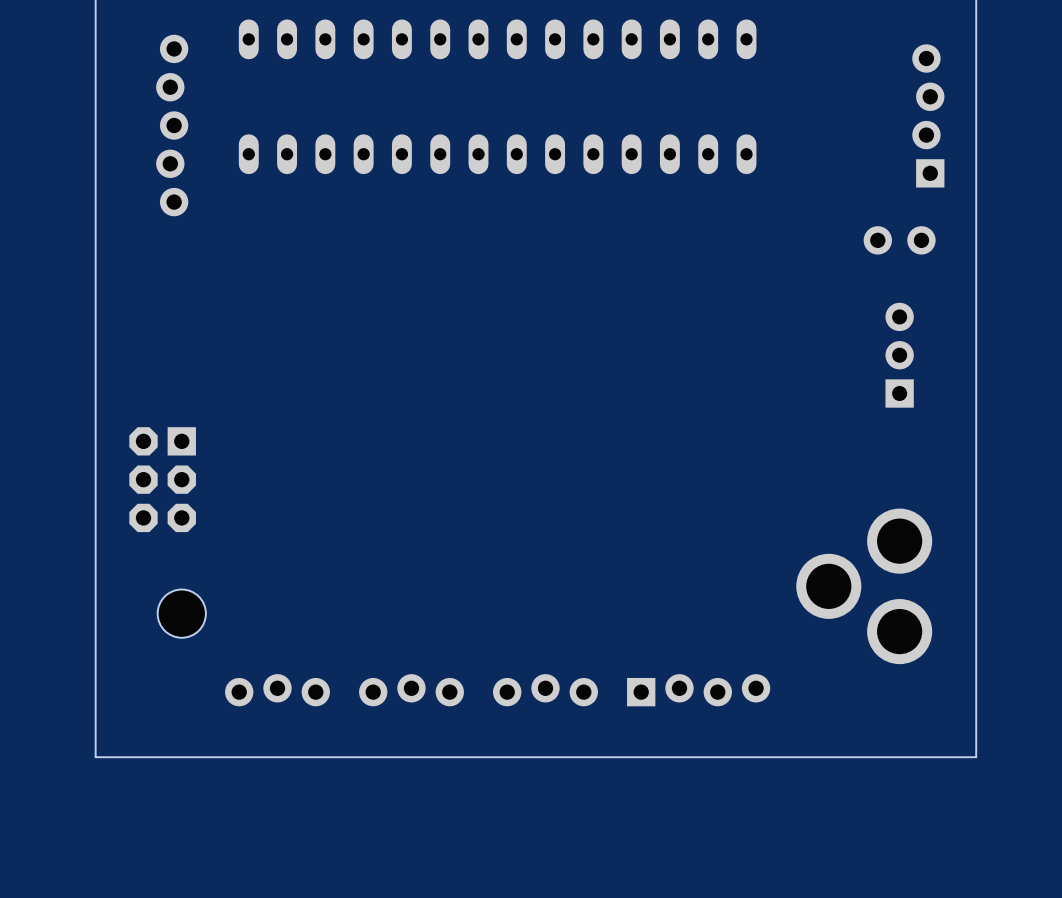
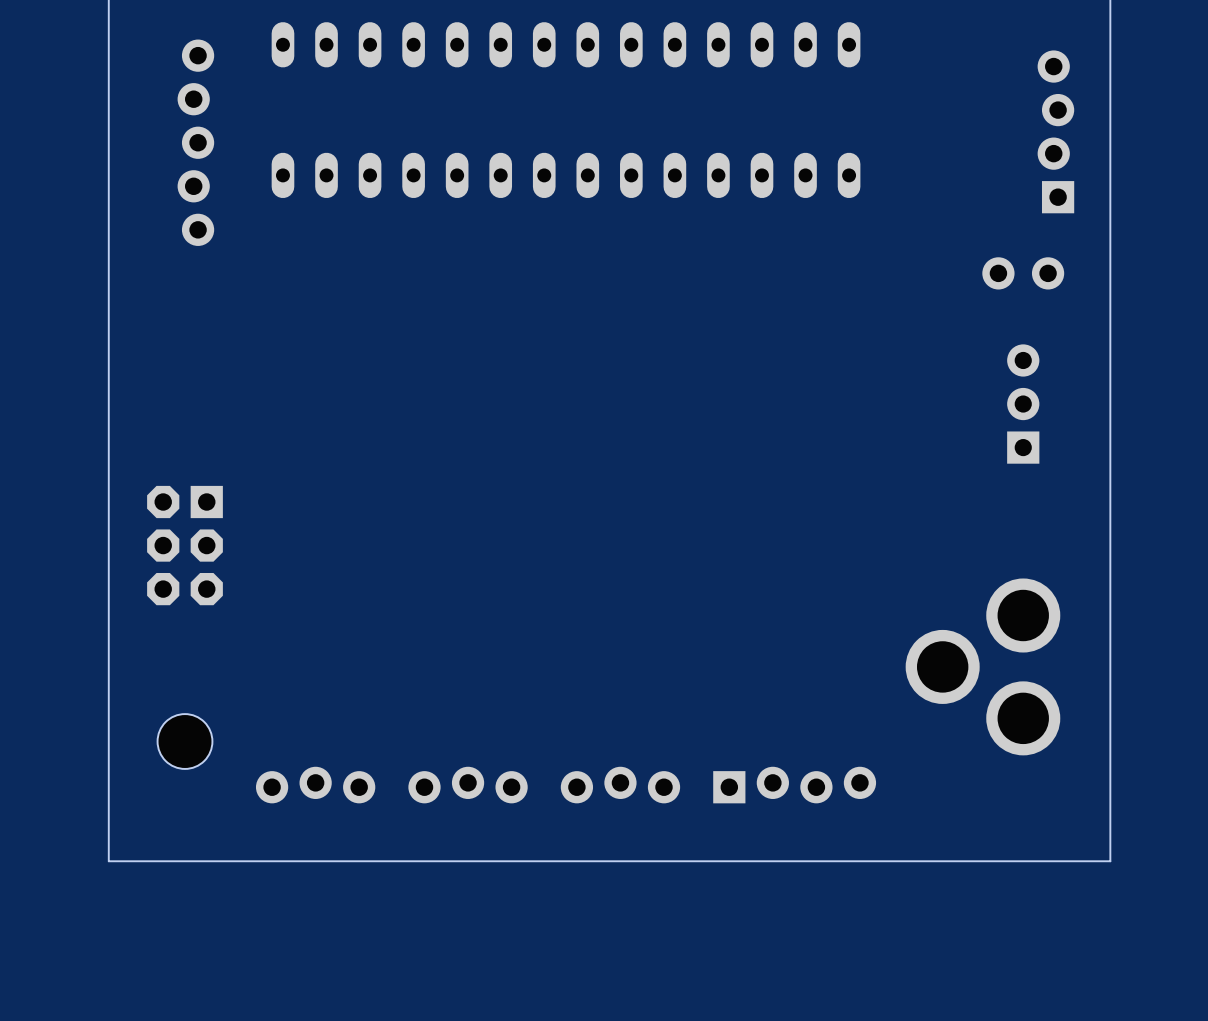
part position: (181, 613) -> (184, 741)

